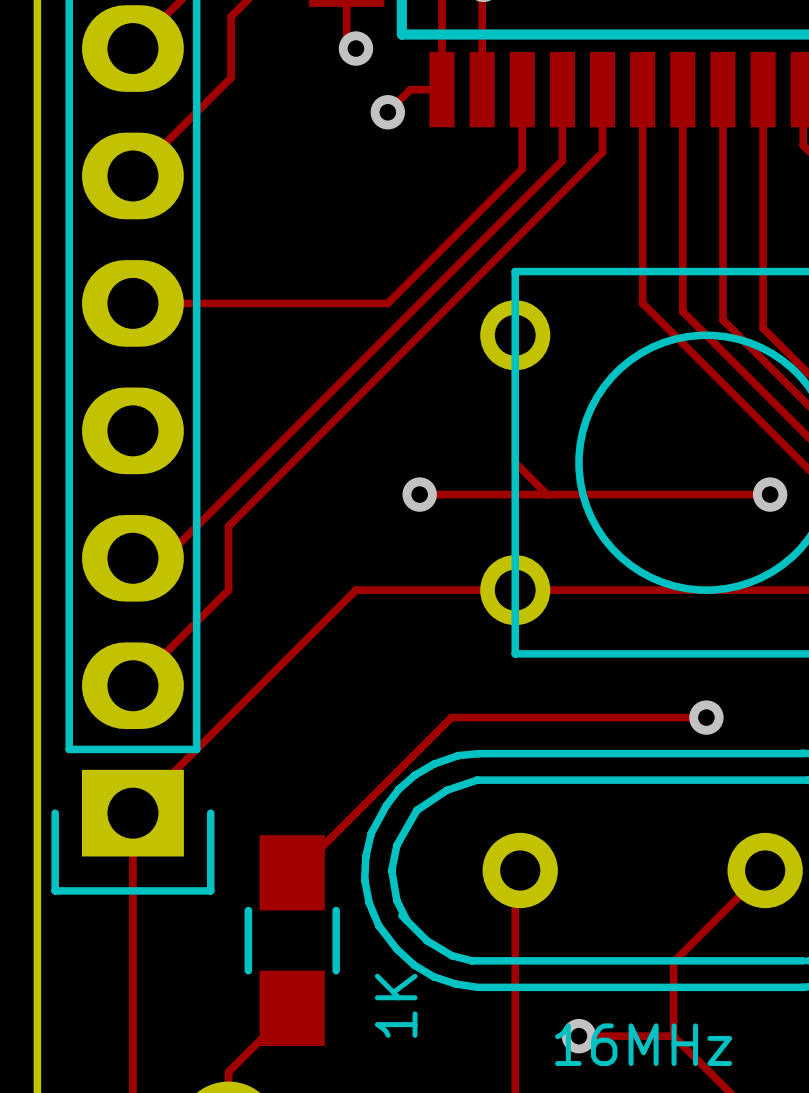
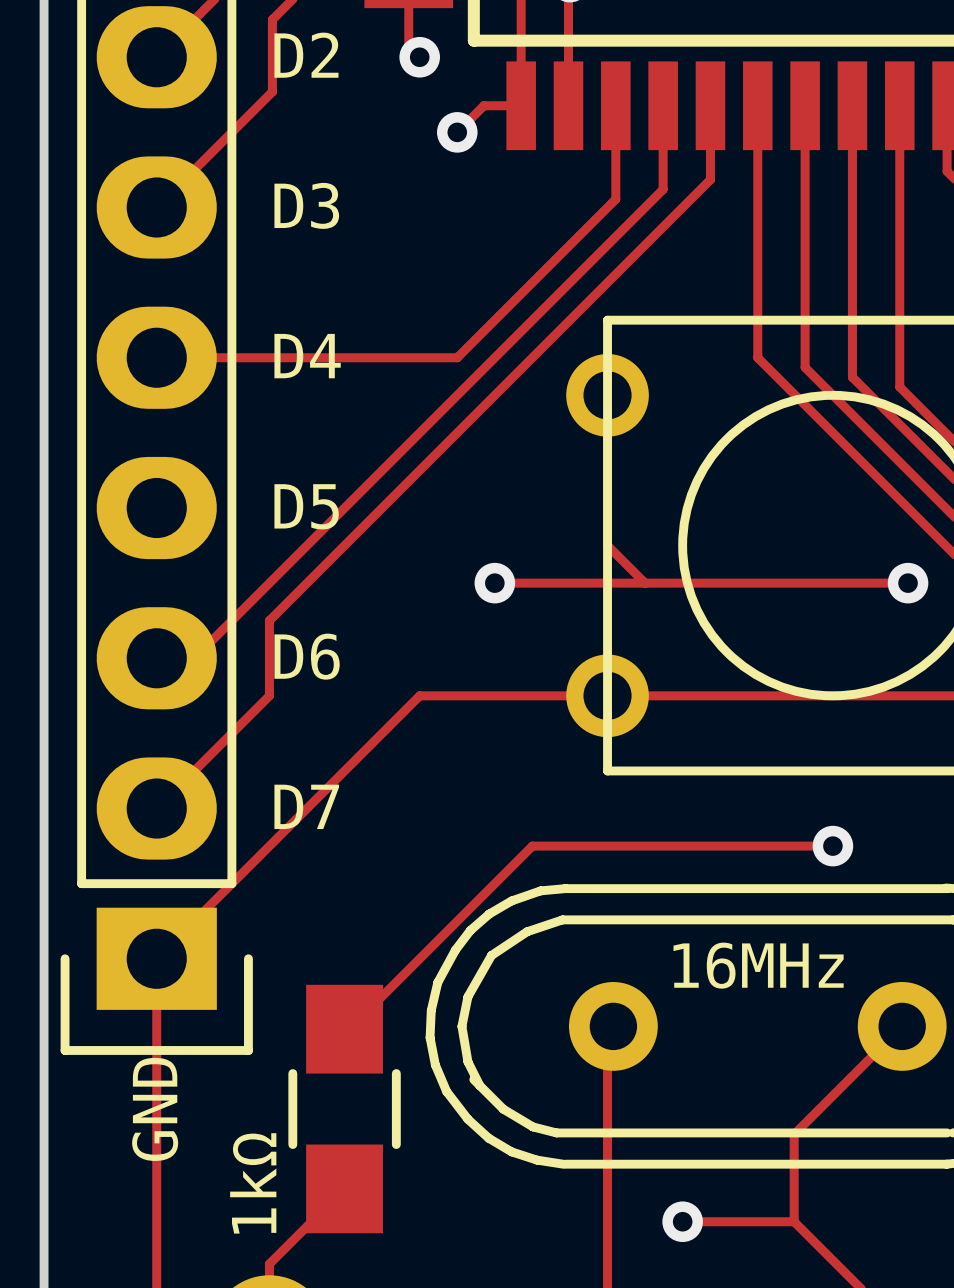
text: none -> D2 (306, 55)
text: none -> D3 (306, 205)
text: none -> D4 (307, 356)
text: none -> D5 (306, 506)
text: none -> D6 (307, 656)
text: none -> D7 (306, 806)
text: none -> GND (155, 1109)
part value: 1K (396, 1005) -> 1kΩ (253, 1183)
part value position: 16MHz (643, 1044) -> 16MHz (758, 965)

